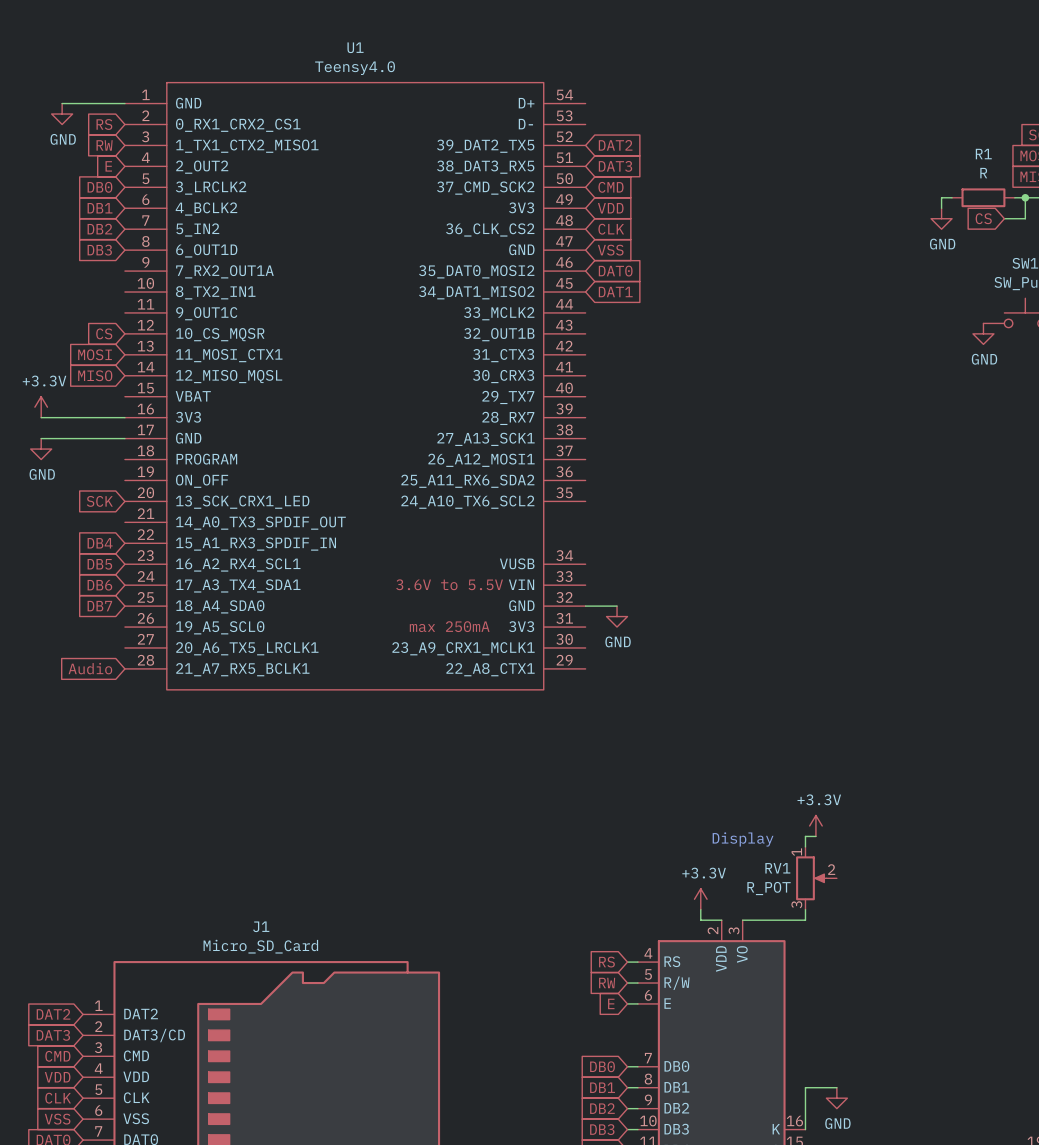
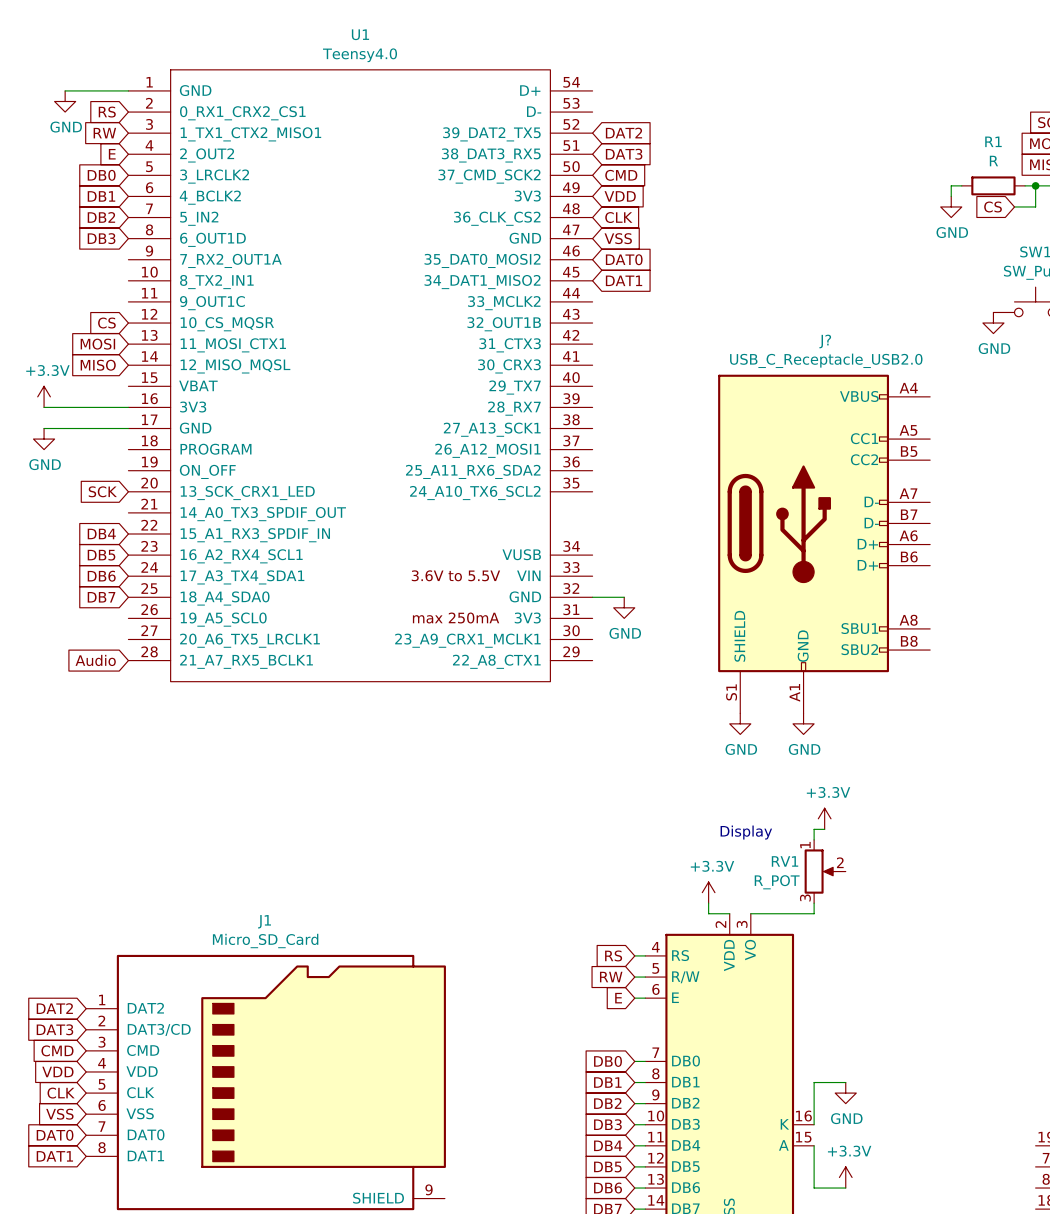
J?: none -> USB_C_Receptacle_USB2.0 (824, 544)
power symbol: none -> GND (740, 723)
power symbol: none -> GND (803, 723)

